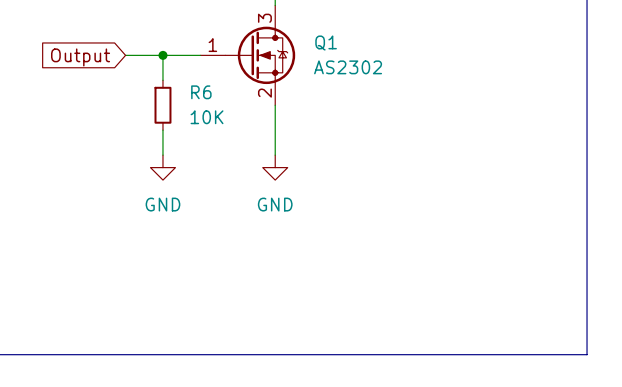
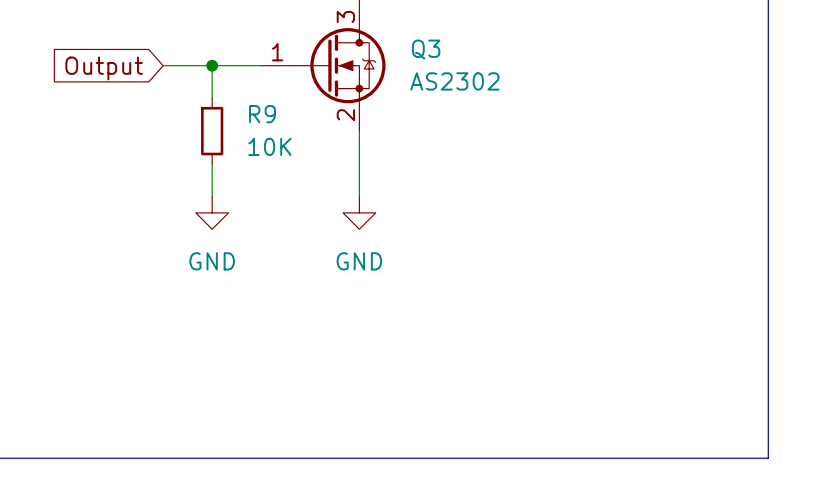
Q1 name: Q1 (326, 43) -> Q3 (426, 49)
R6 name: R6 (201, 92) -> R9 (262, 114)

